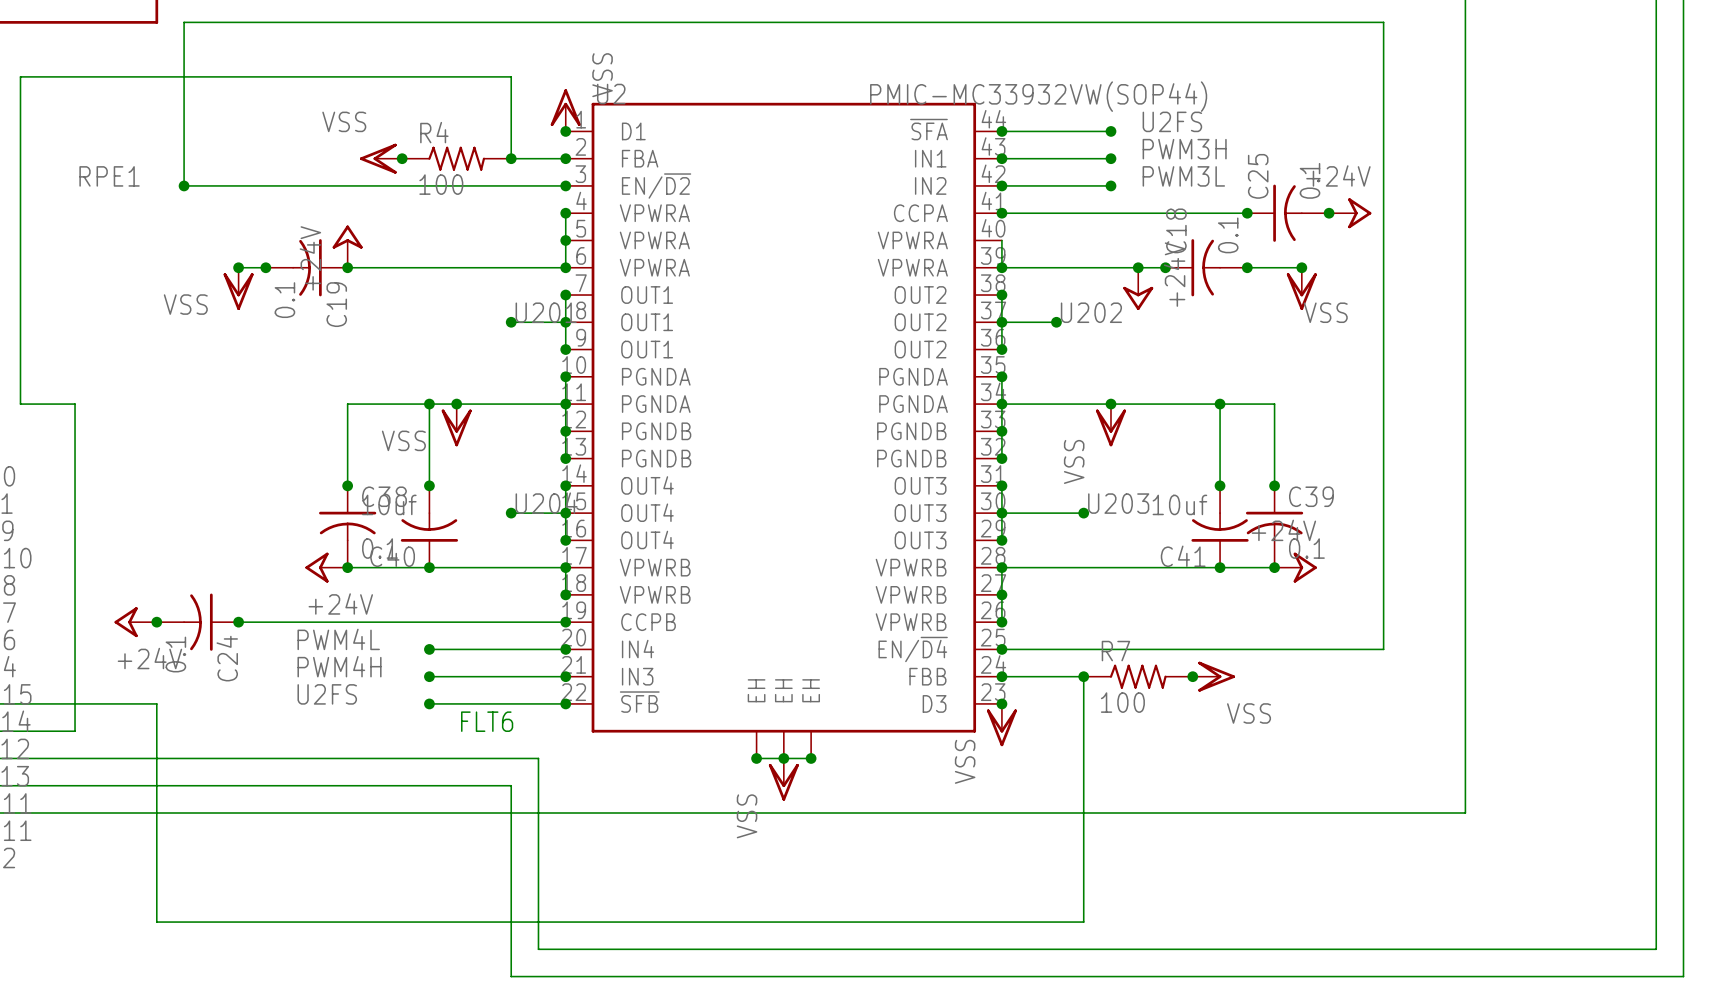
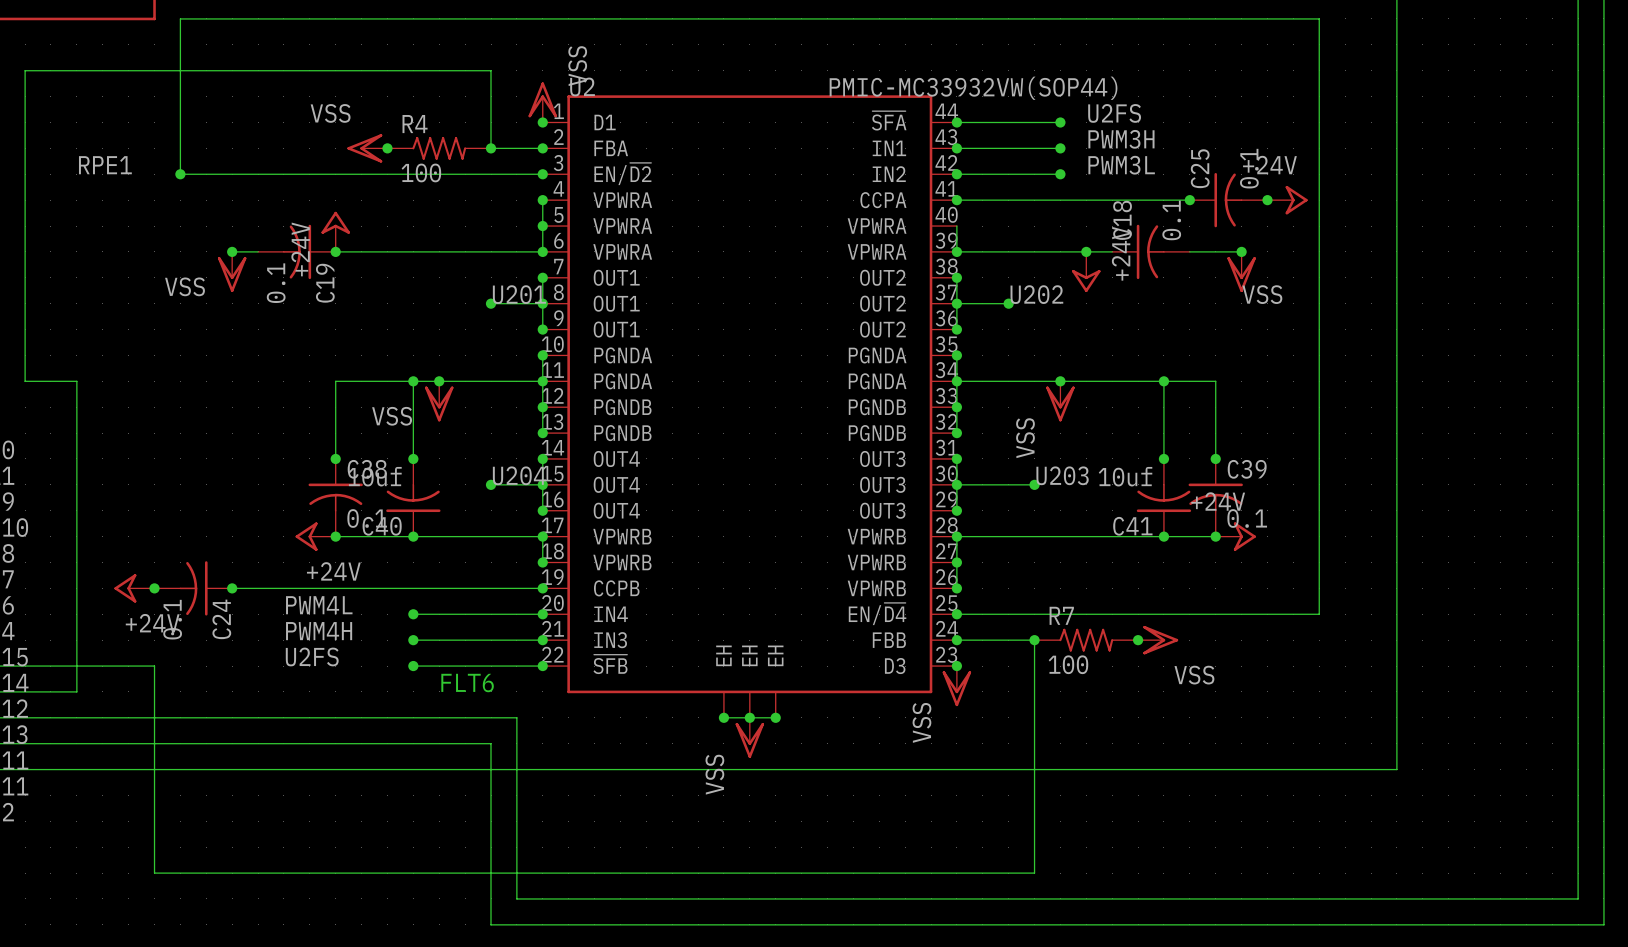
junction: (265, 267) -> none
junction: (1165, 267) -> none
junction: (1247, 267) -> none

